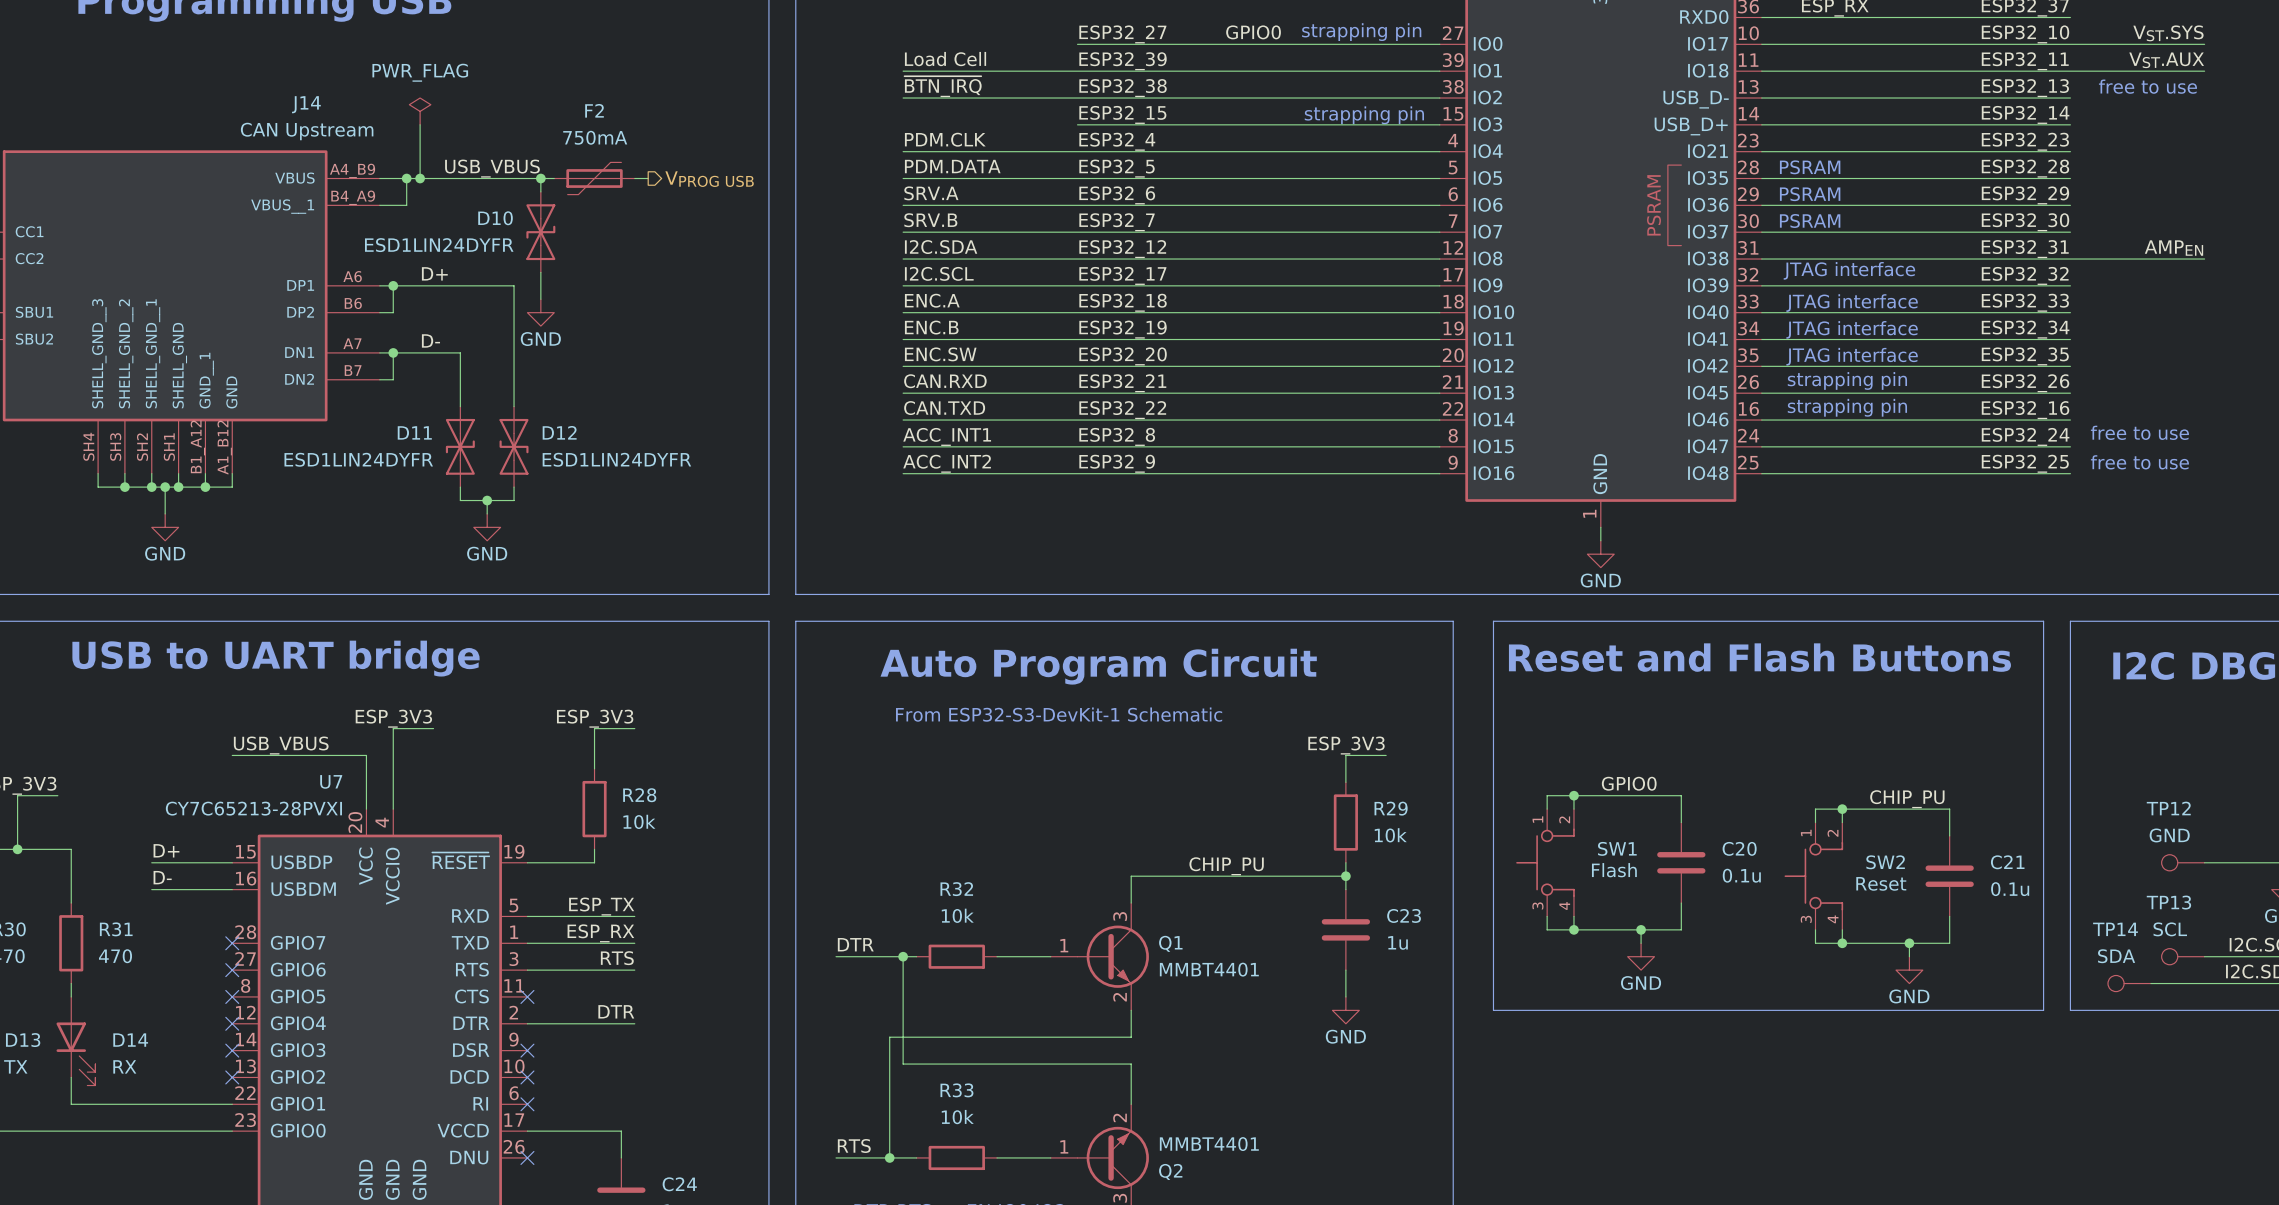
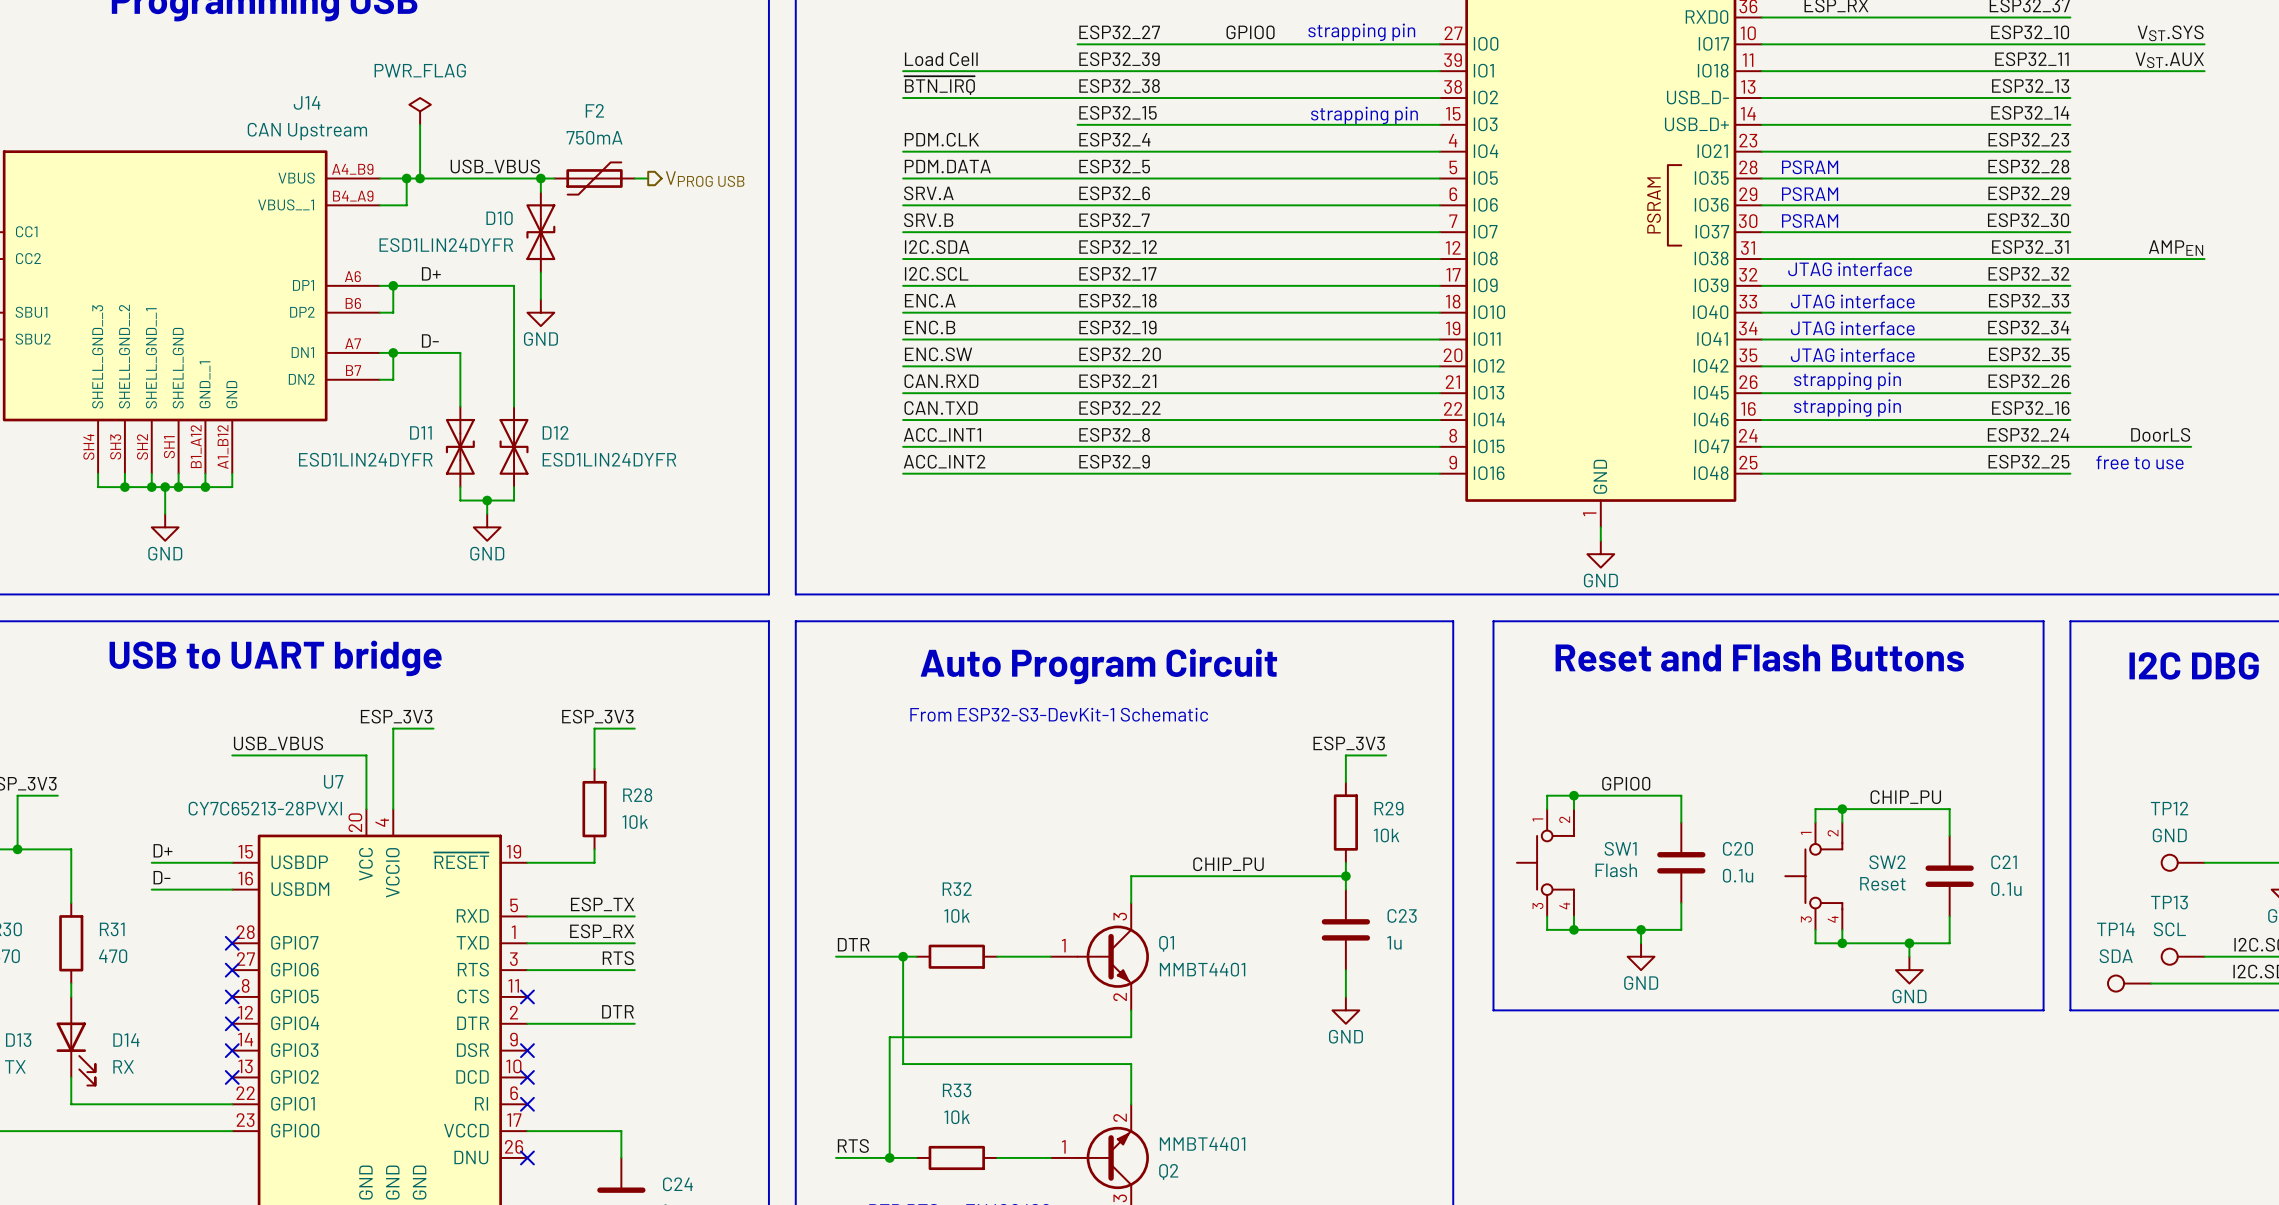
text: free to use (2147, 86) -> none
text: free to use (2139, 432) -> none
label: none -> DoorLS (2160, 434)
wire: none -> (2070, 446) (2191, 446)

